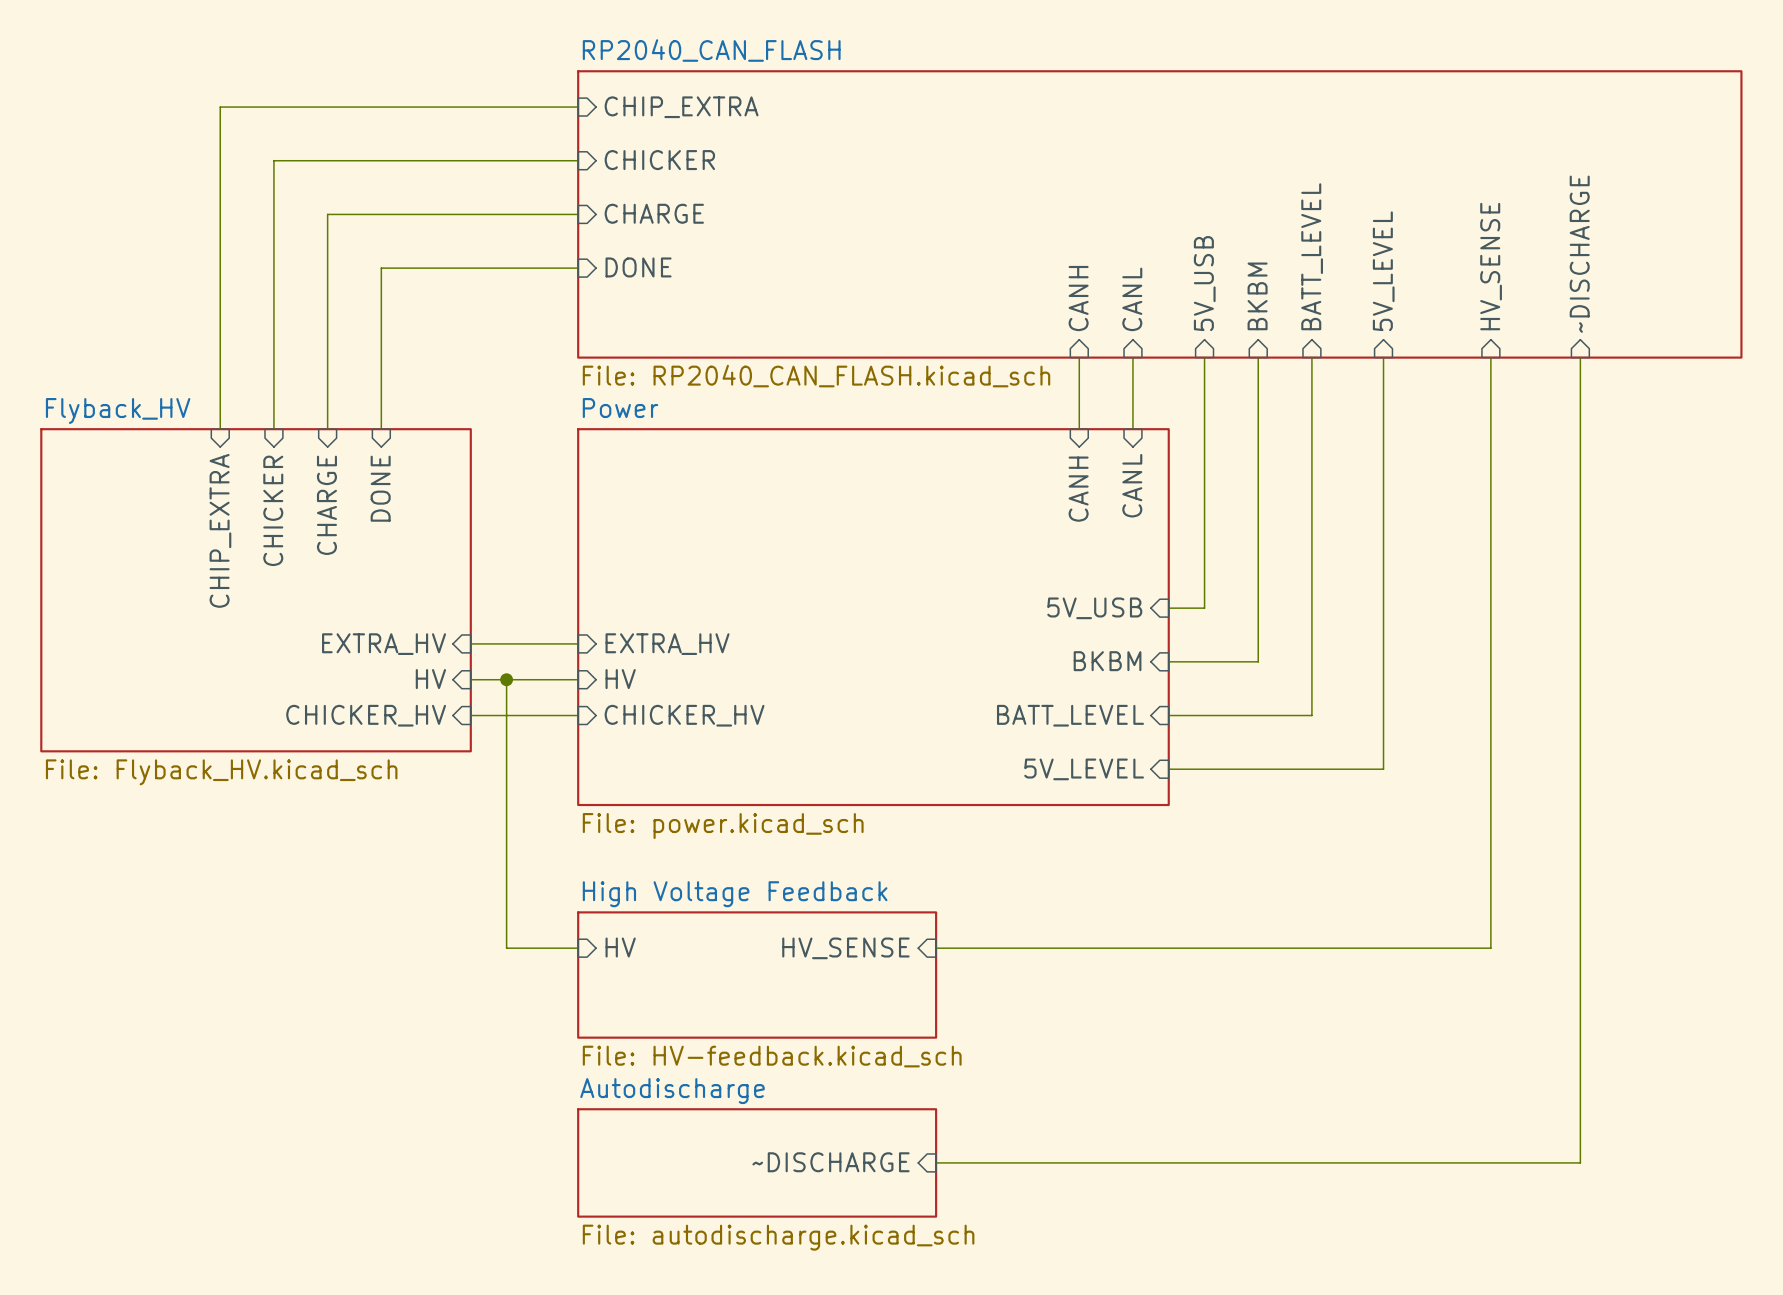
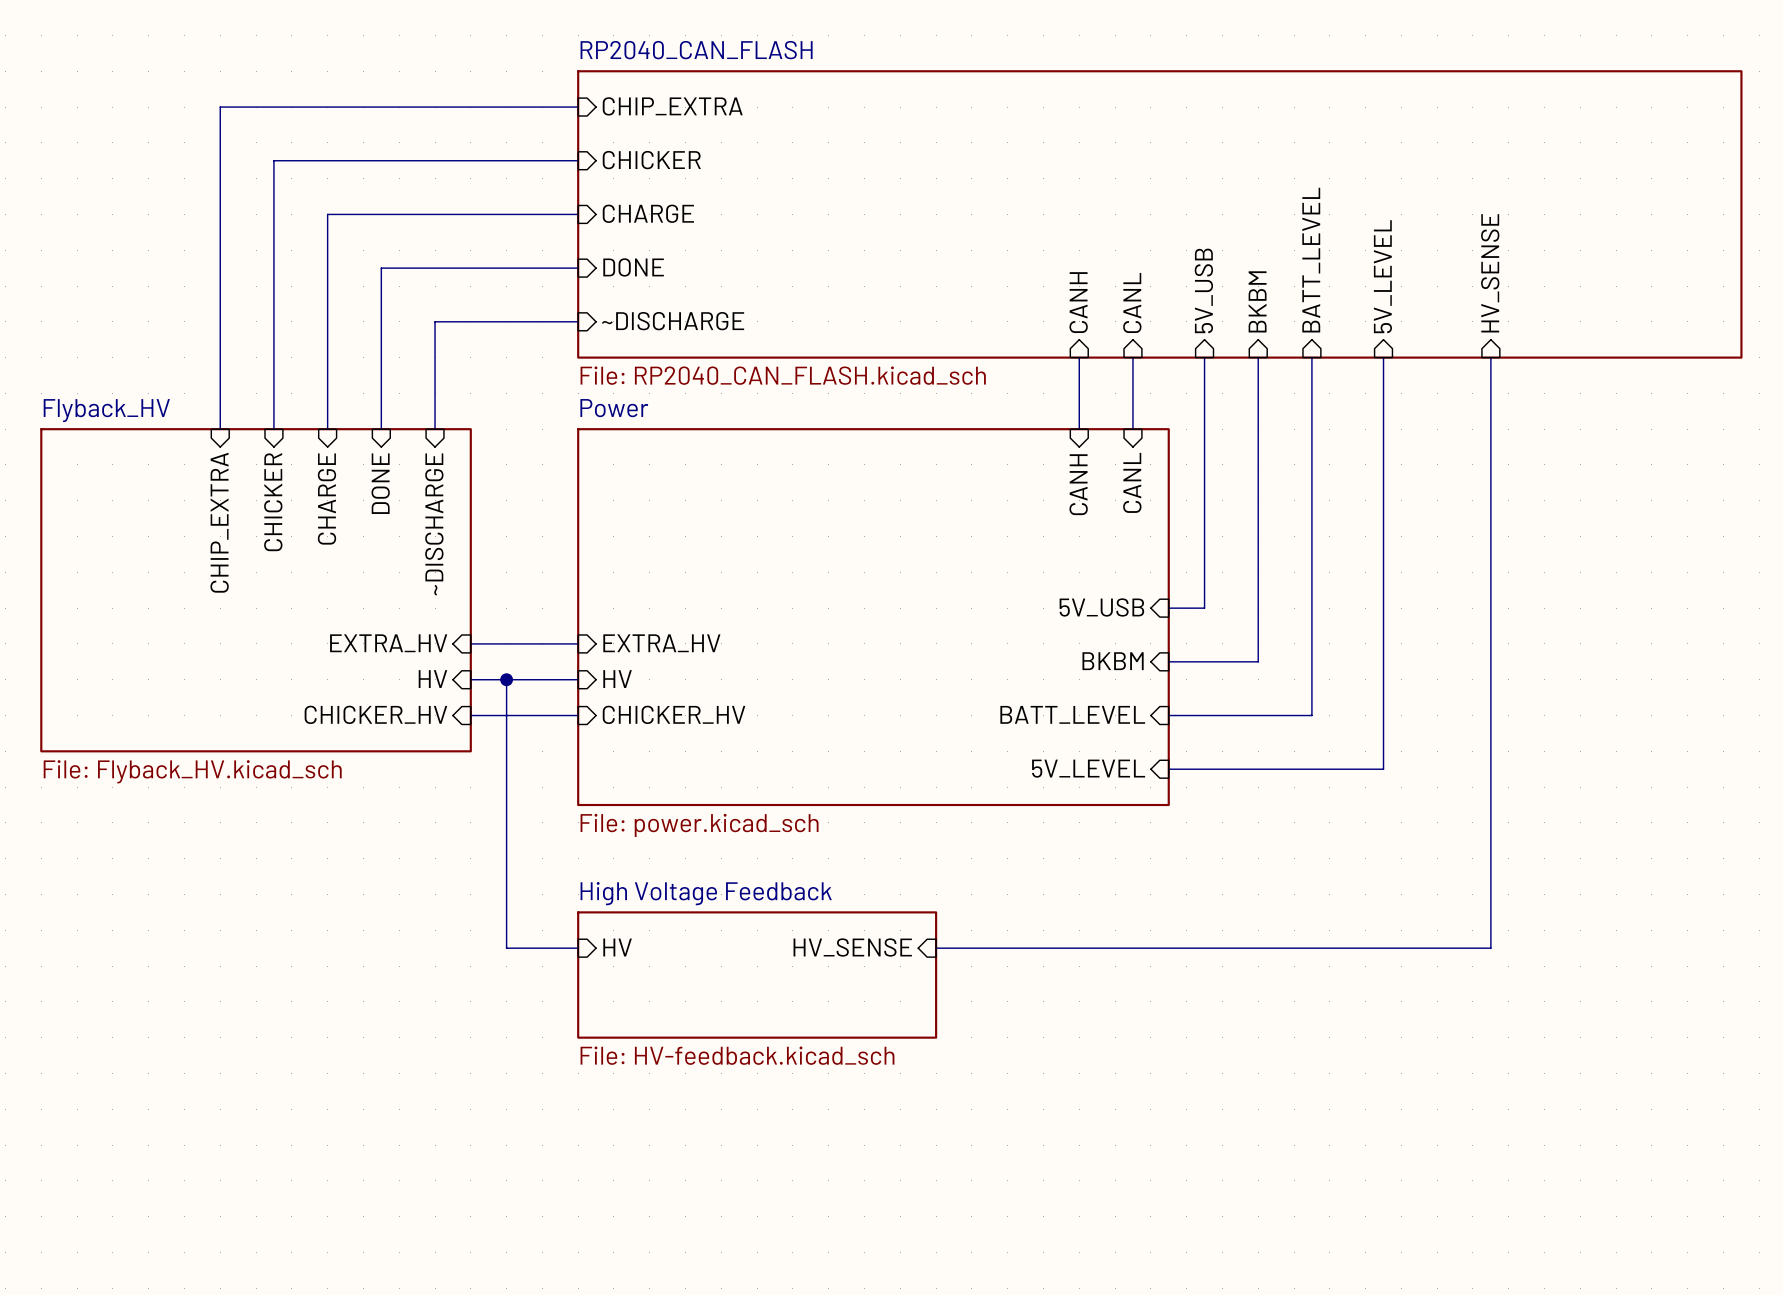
sheet pin: ~DISCHARGE (1579, 254) -> none
wire: none -> (578, 321) (435, 321) (435, 429)
sheet pin: none -> ~DISCHARGE (673, 321)
wire: (1580, 357) (1580, 1162) (936, 1162) -> none
sheet pin: none -> ~DISCHARGE (434, 524)
sheet Autodischarge: File: autodischarge.kicad_sch (757, 1162) -> none
sheet pin: ~DISCHARGE (831, 1162) -> none

